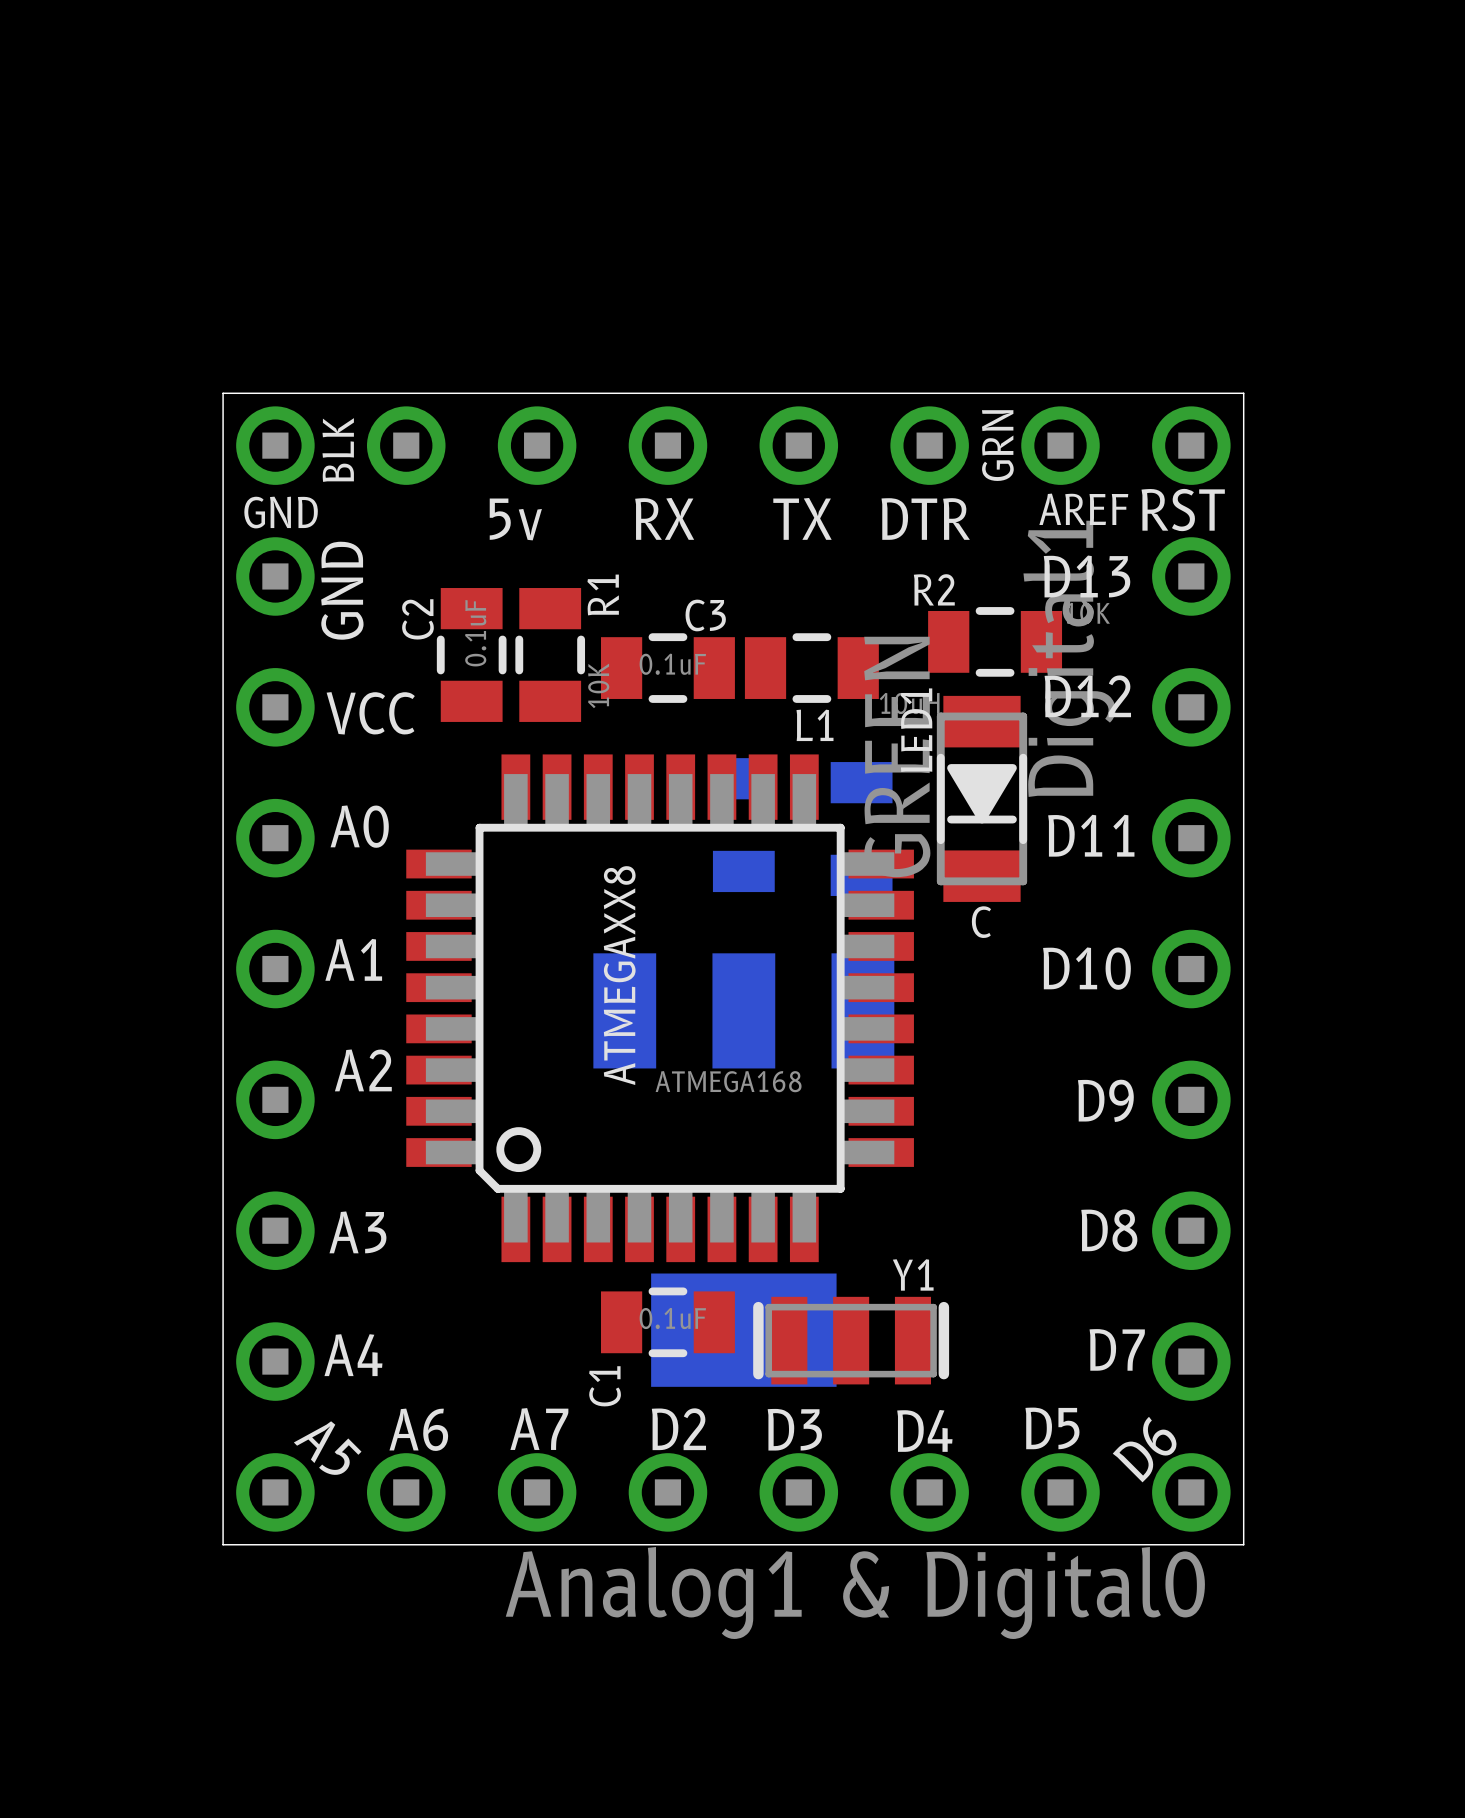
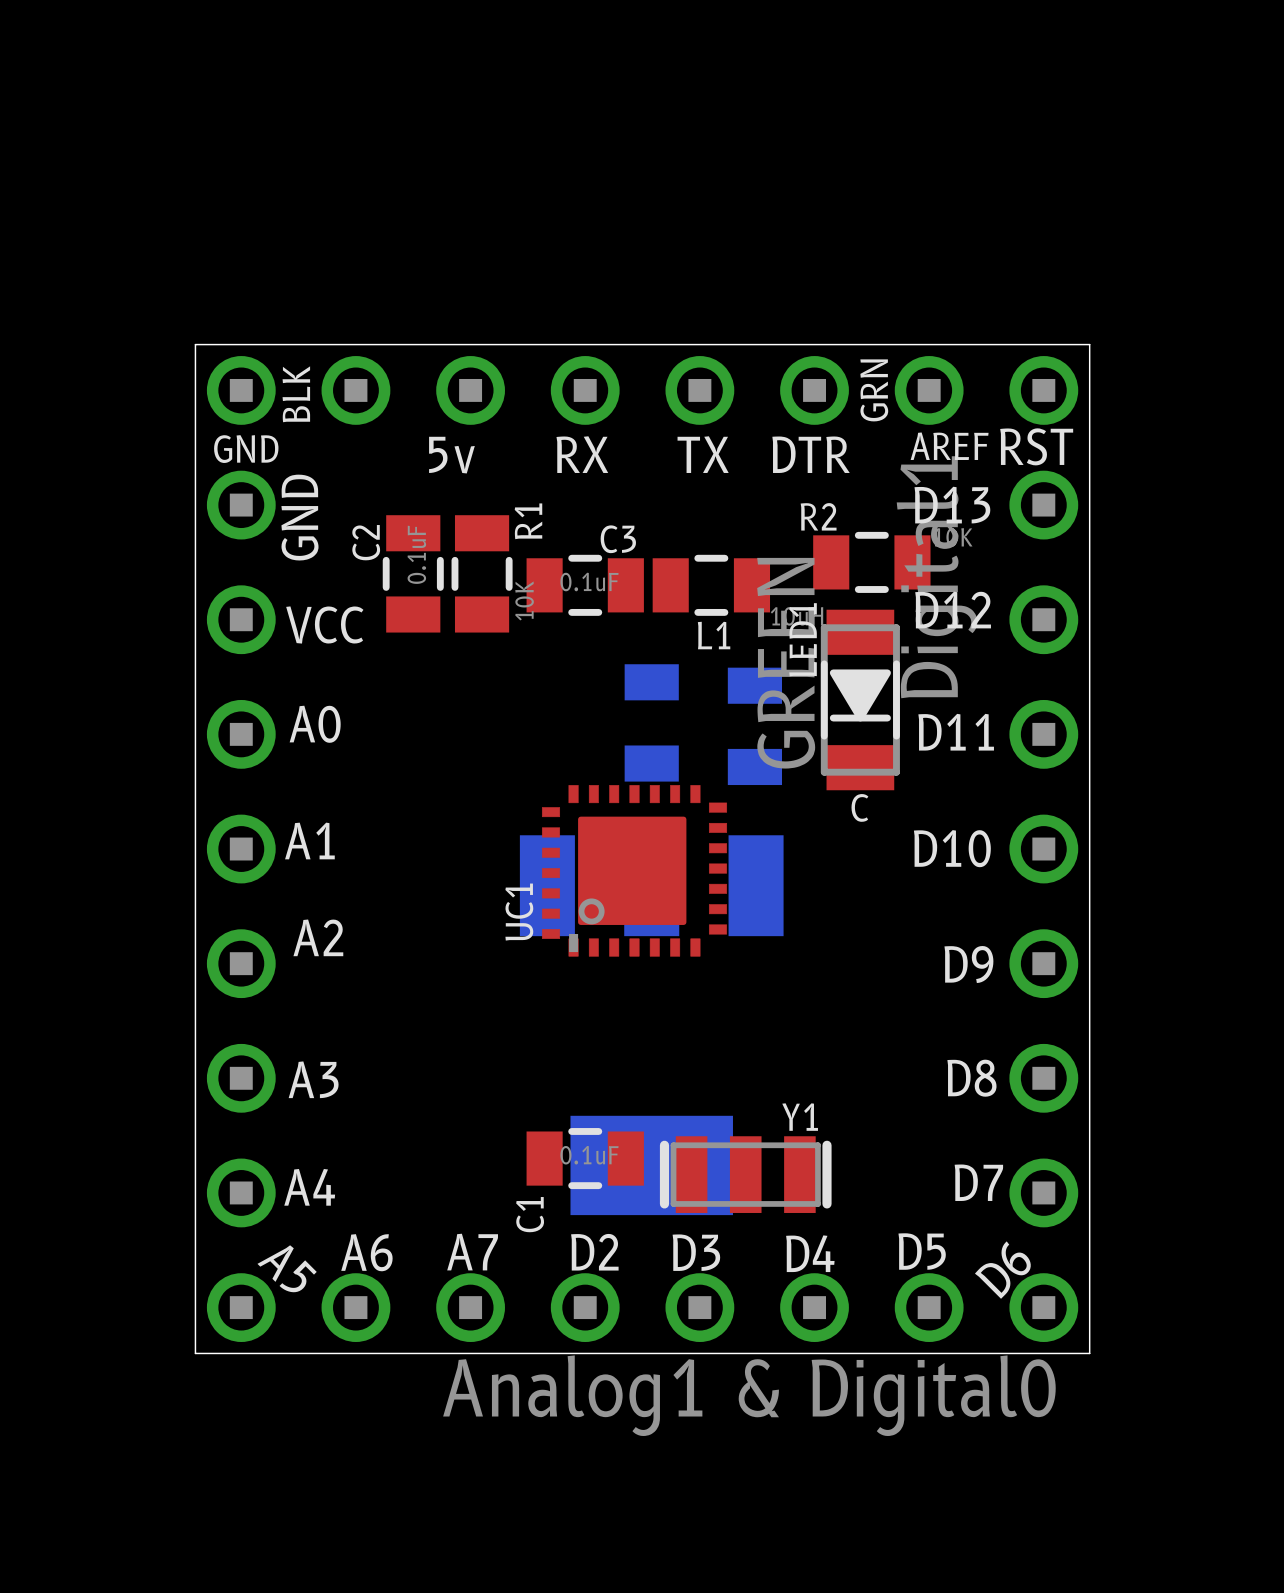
UC1: none -> (634, 870)
ATMEGAXX8: ATMEGA168 (660, 1008) -> none

